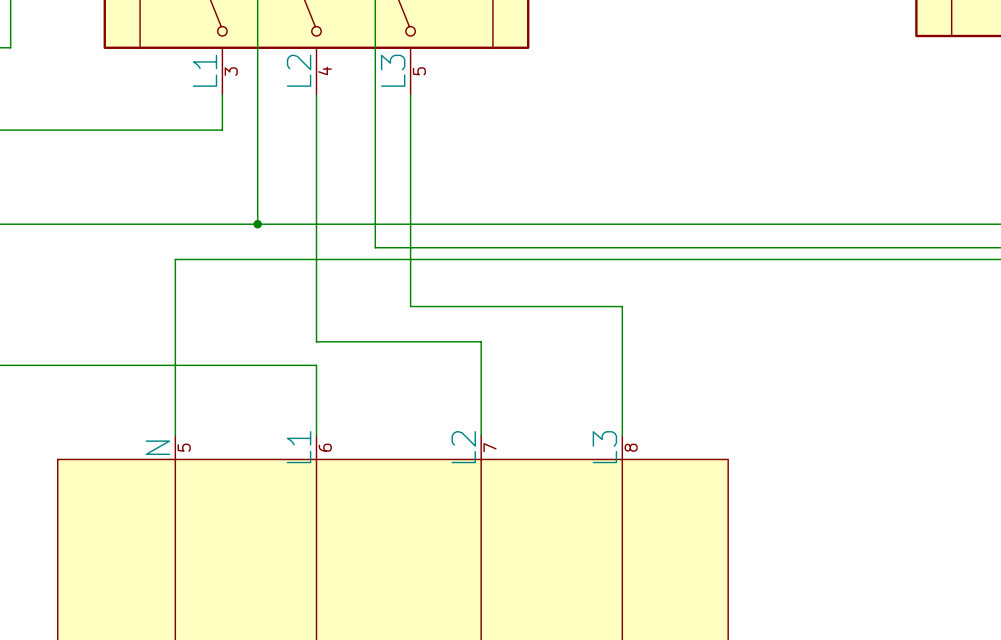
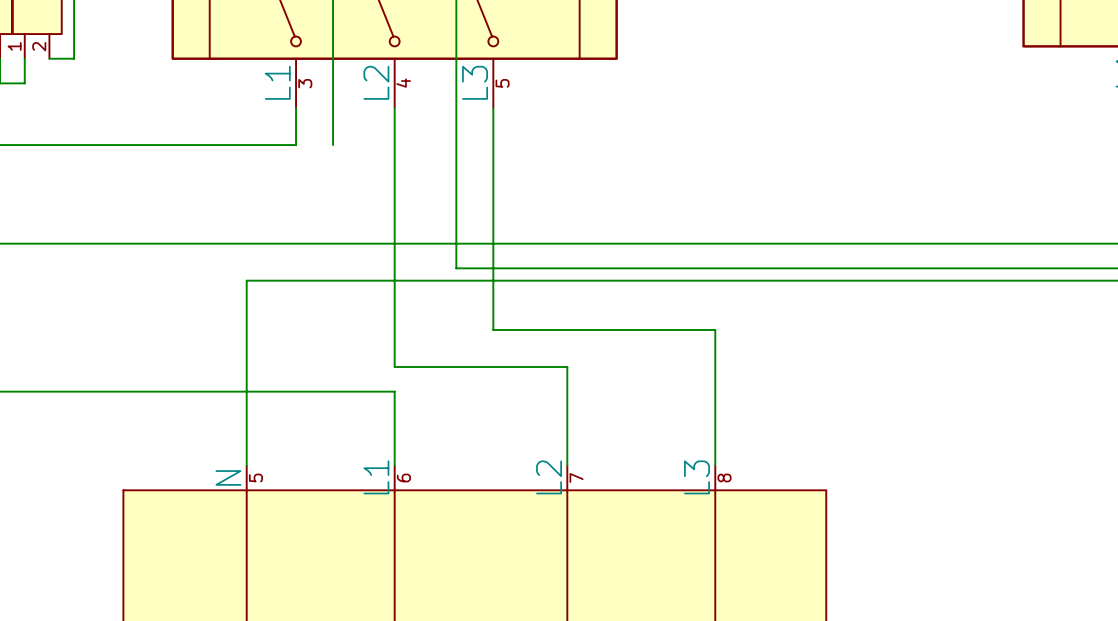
wire: (257, 130) (257, 224) -> none
junction: (257, 224) -> none

